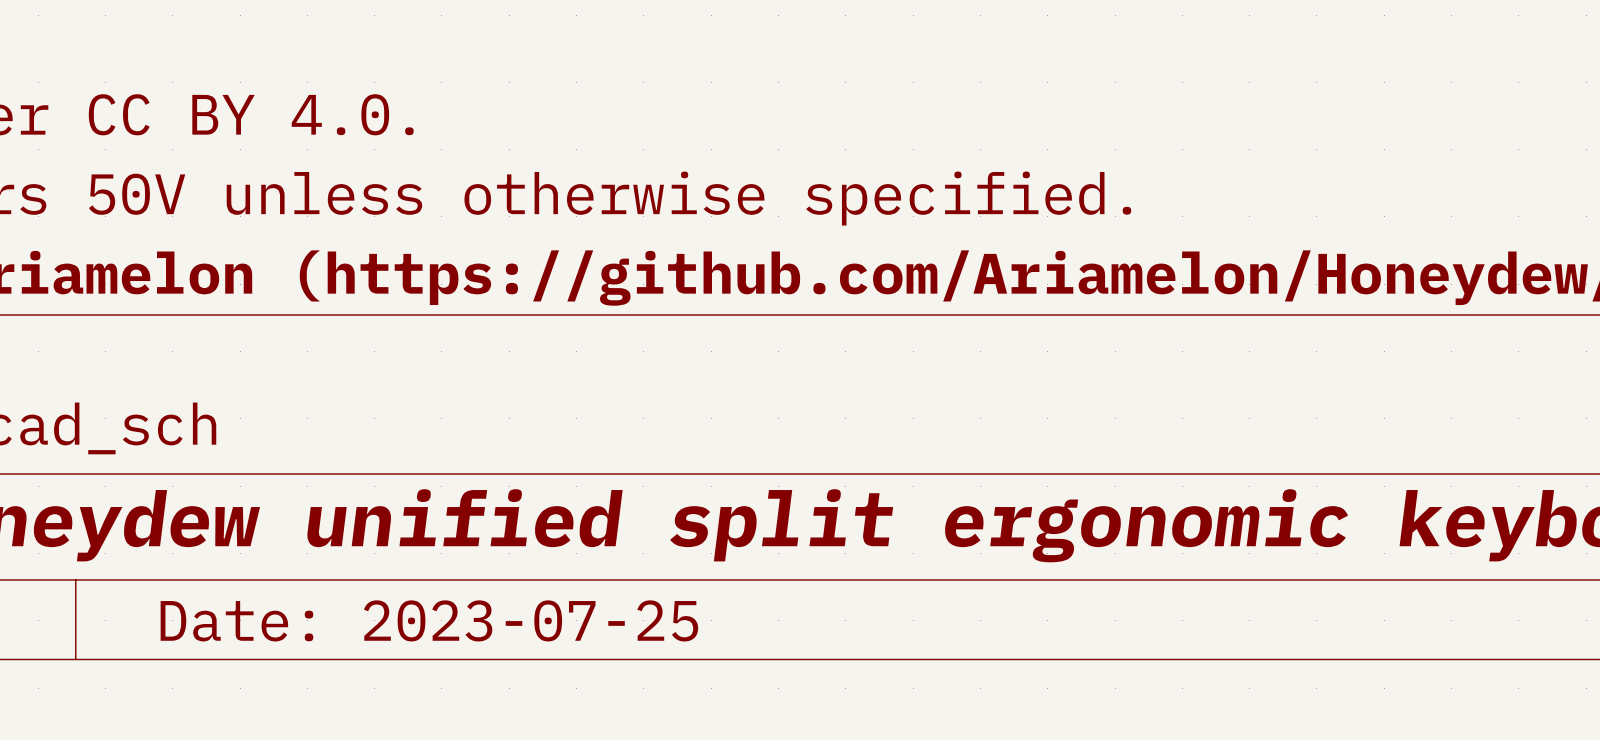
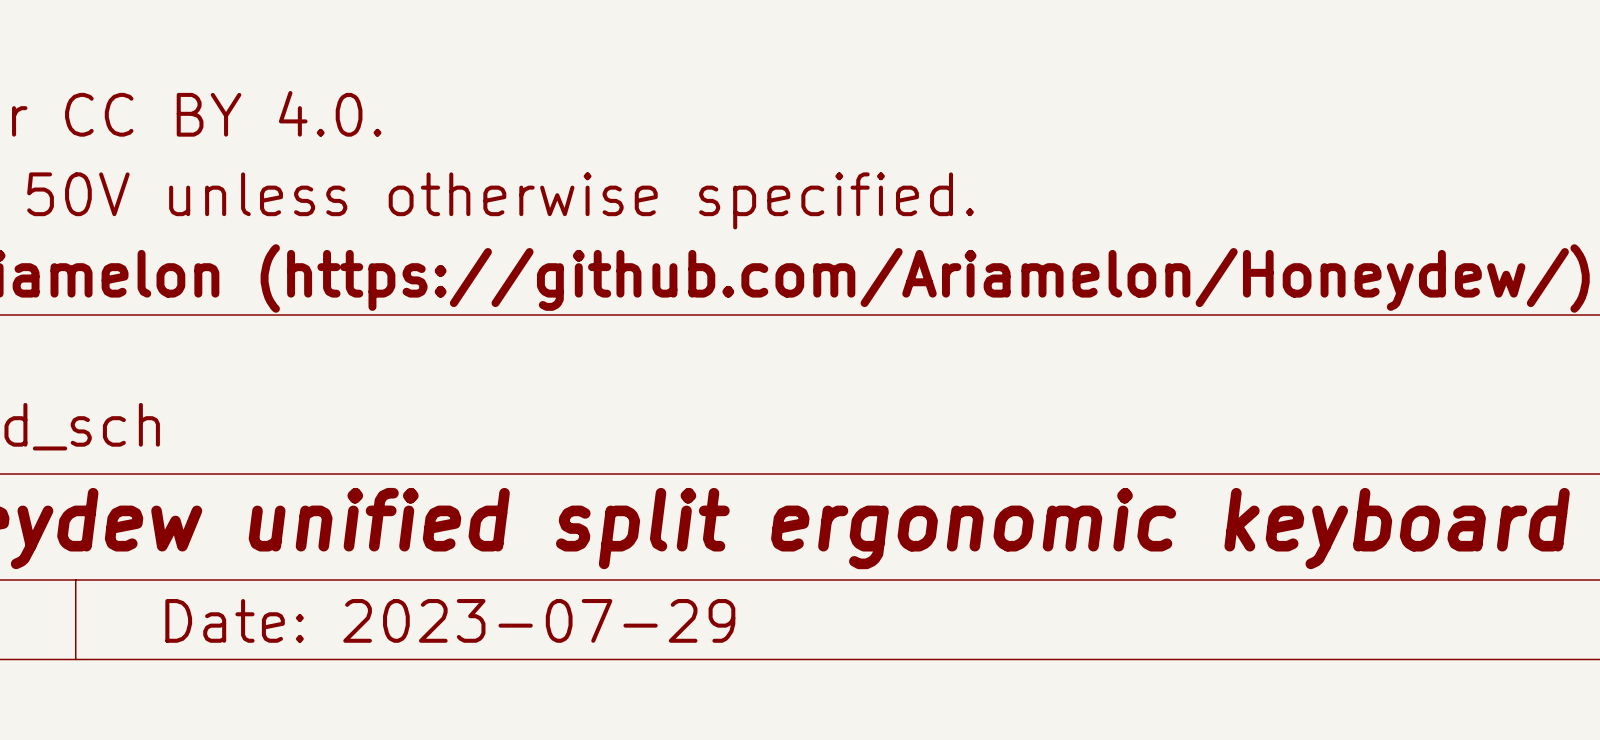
title block: Date: 2023-07-25 (429, 620) -> Date: 2023-07-29 (450, 620)

